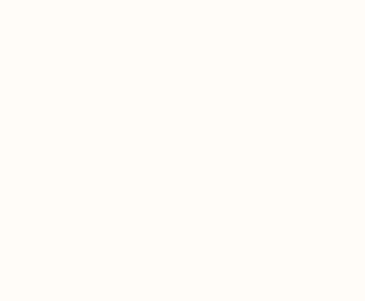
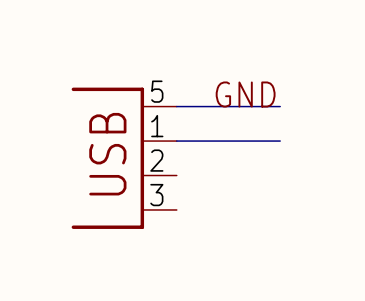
label: none -> GND (245, 94)
wire: none -> (176, 106) (280, 106)
wire: none -> (176, 141) (280, 141)
part: none -> (124, 158)

